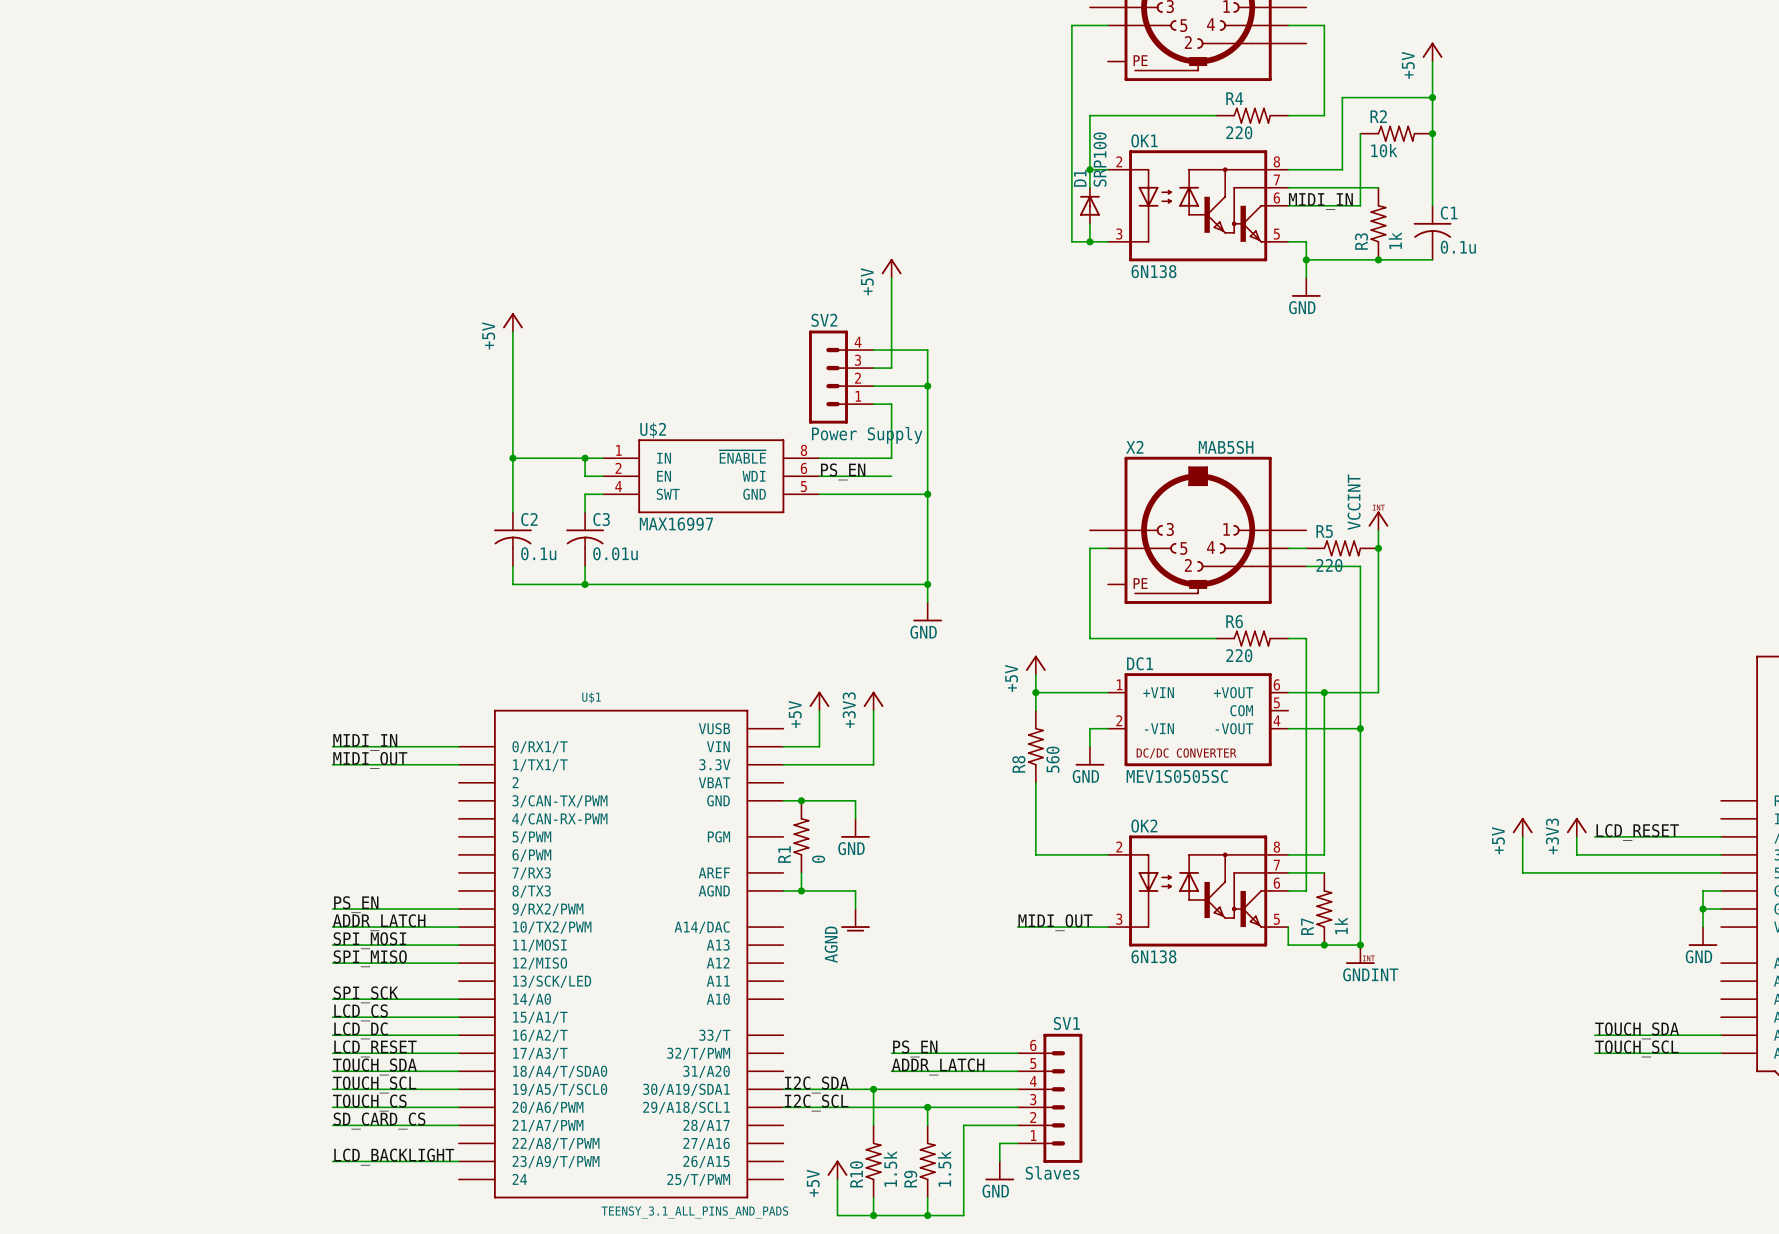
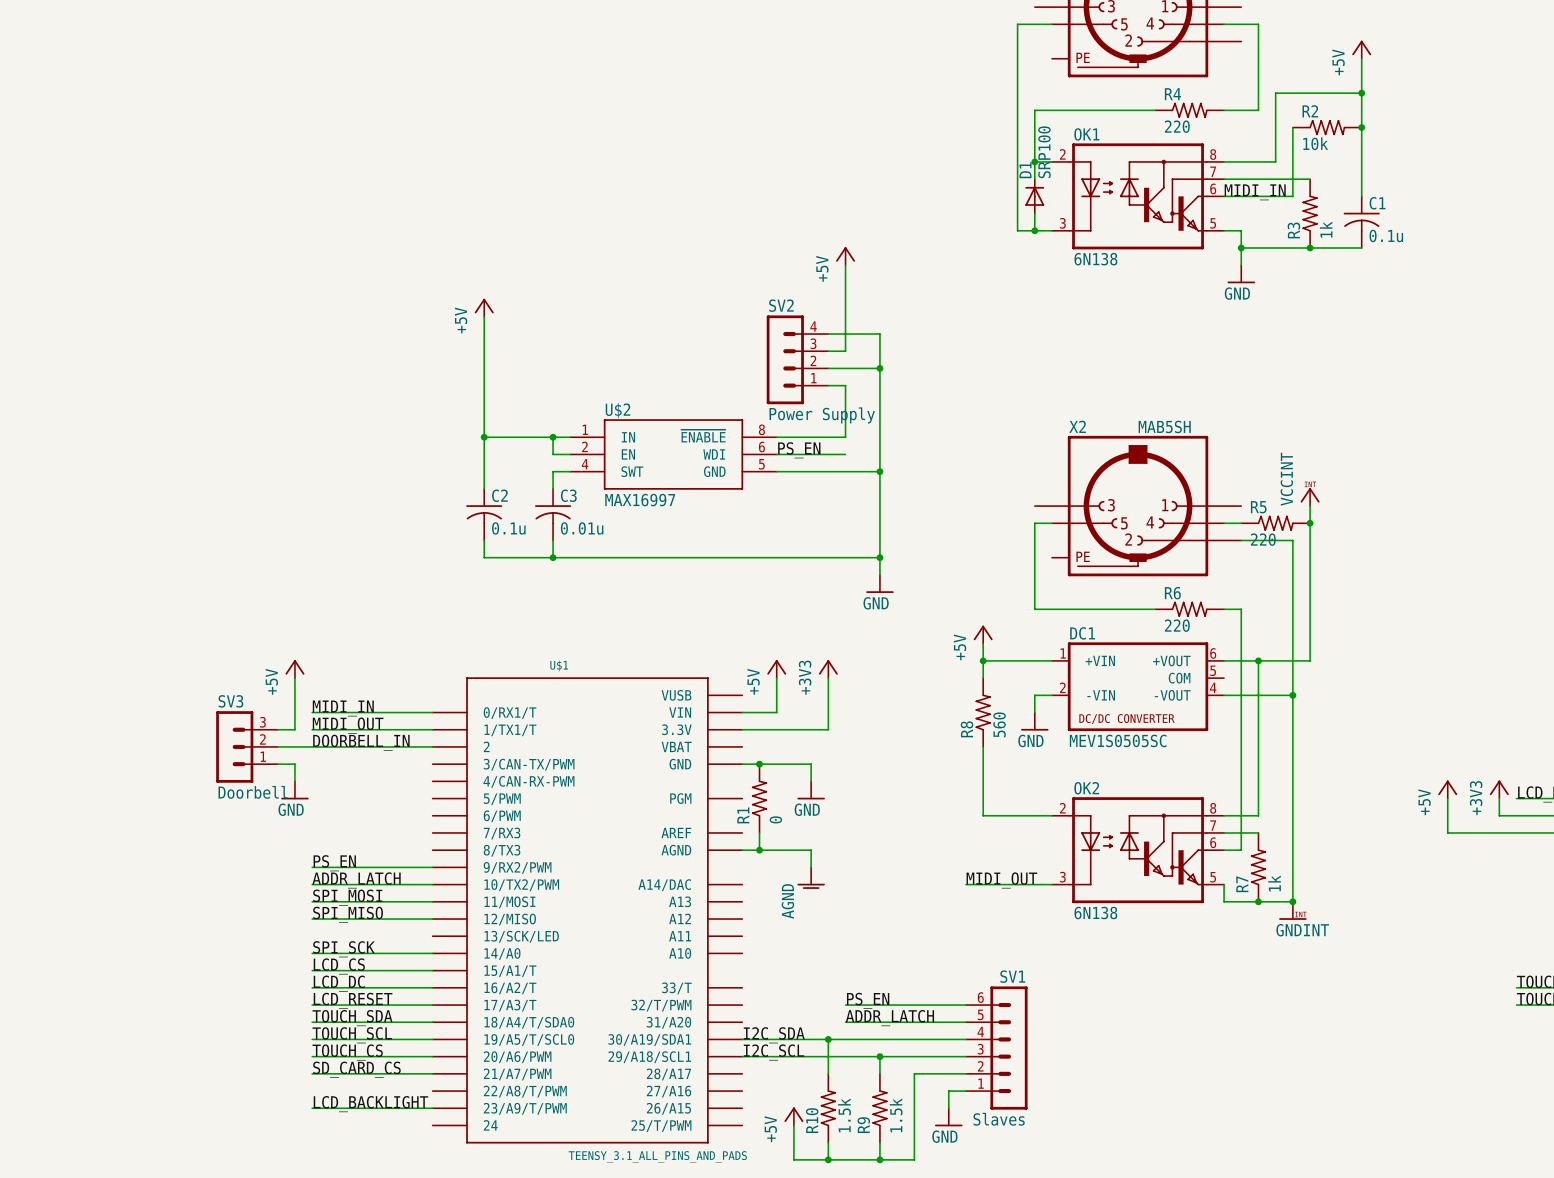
power symbol: none -> +5V (294, 669)
wire: none -> (294, 678) (294, 729) (277, 729)
label: none -> DOORBELL_IN (361, 742)
SV3: none -> Doorbell (246, 746)
wire: none -> (277, 746) (432, 746)
wire: none -> (277, 764) (294, 764) (294, 781)
power symbol: none -> GND (294, 790)

